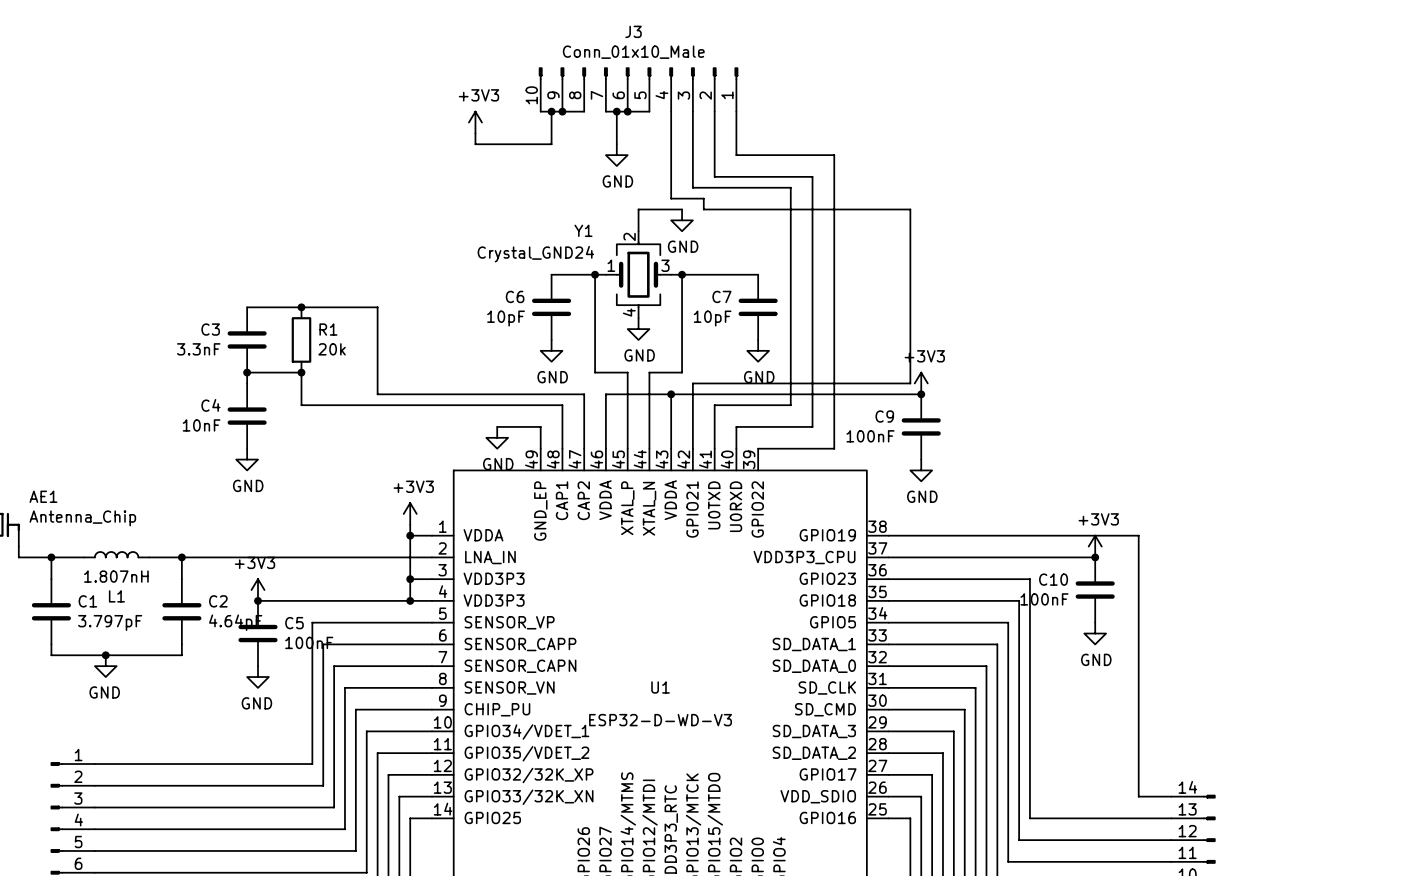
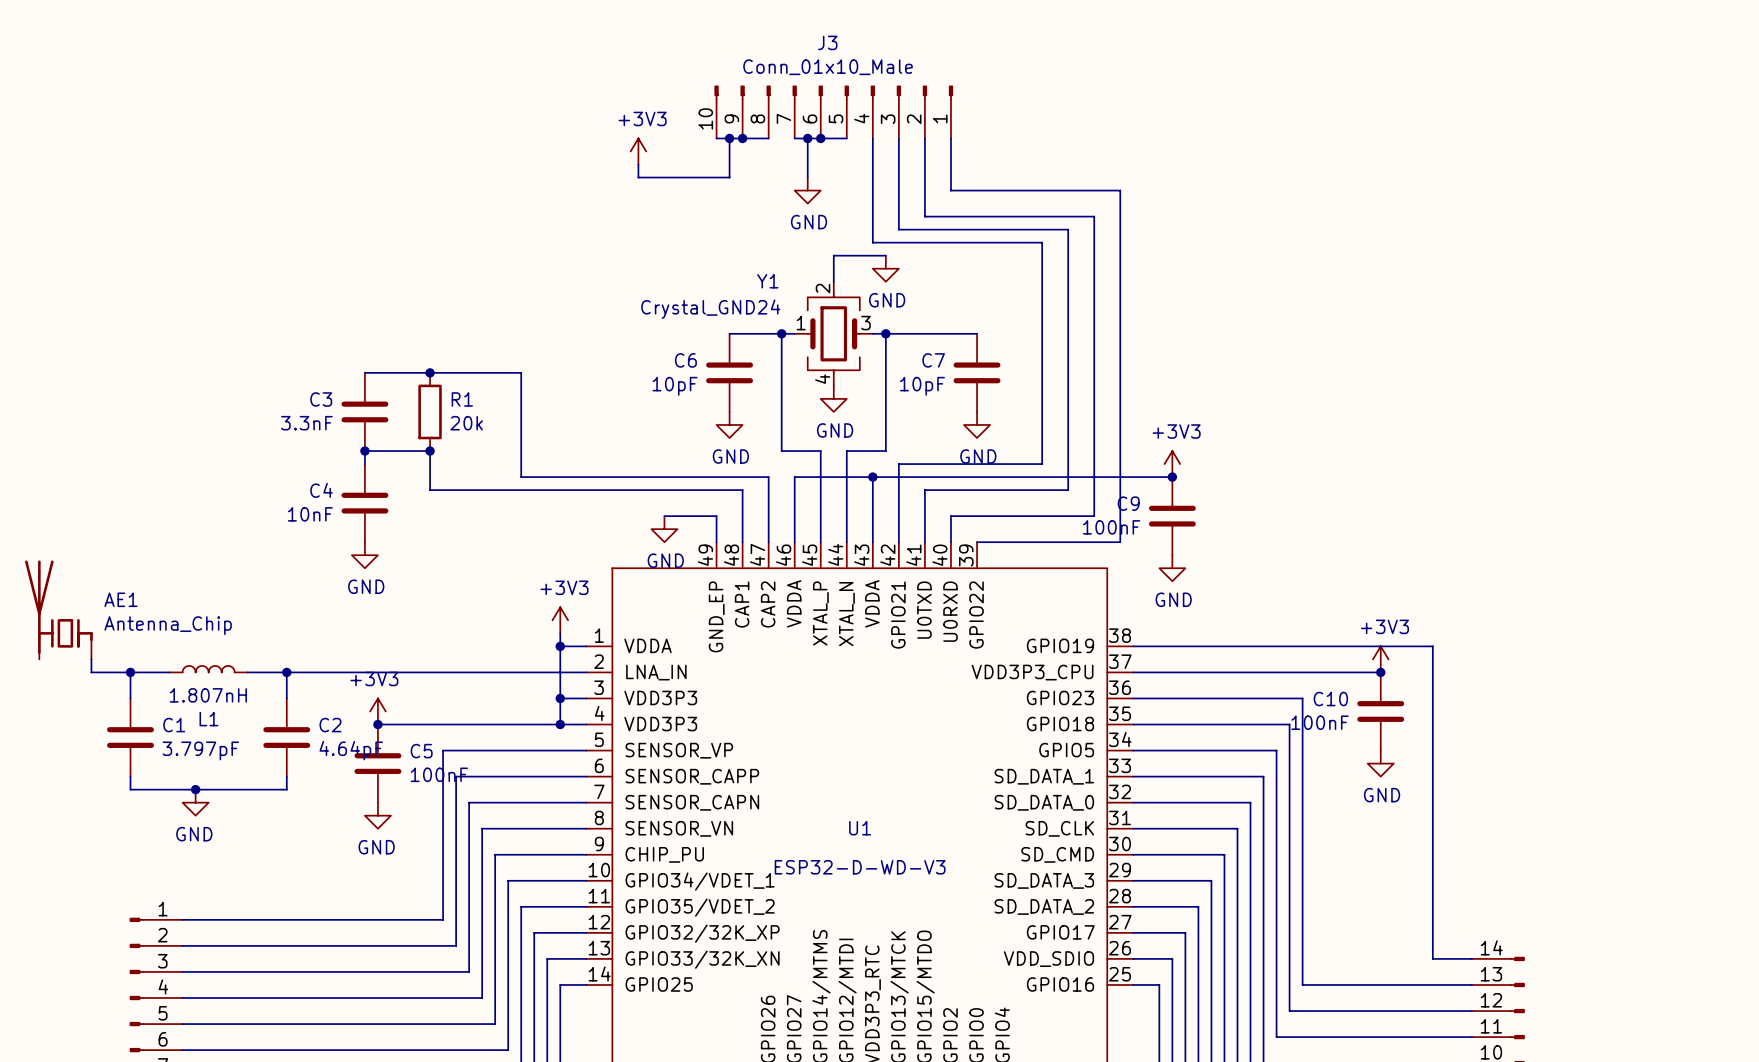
wire: (834, 155) (834, 187) -> (1016, 229) (1068, 229)
wire: none -> (1068, 190) (1120, 190) (1120, 542) (1068, 542)
wire: (812, 176) (812, 198) -> (911, 242) (1042, 242)
wire: (790, 187) (790, 405) -> none
wire: (703, 198) (703, 209) (910, 209) (910, 383) (812, 383) (812, 426) -> (1042, 216) (1094, 216) (1094, 516) (1042, 516)
wire: (834, 405) (834, 448) -> (1068, 490) (1016, 490)

